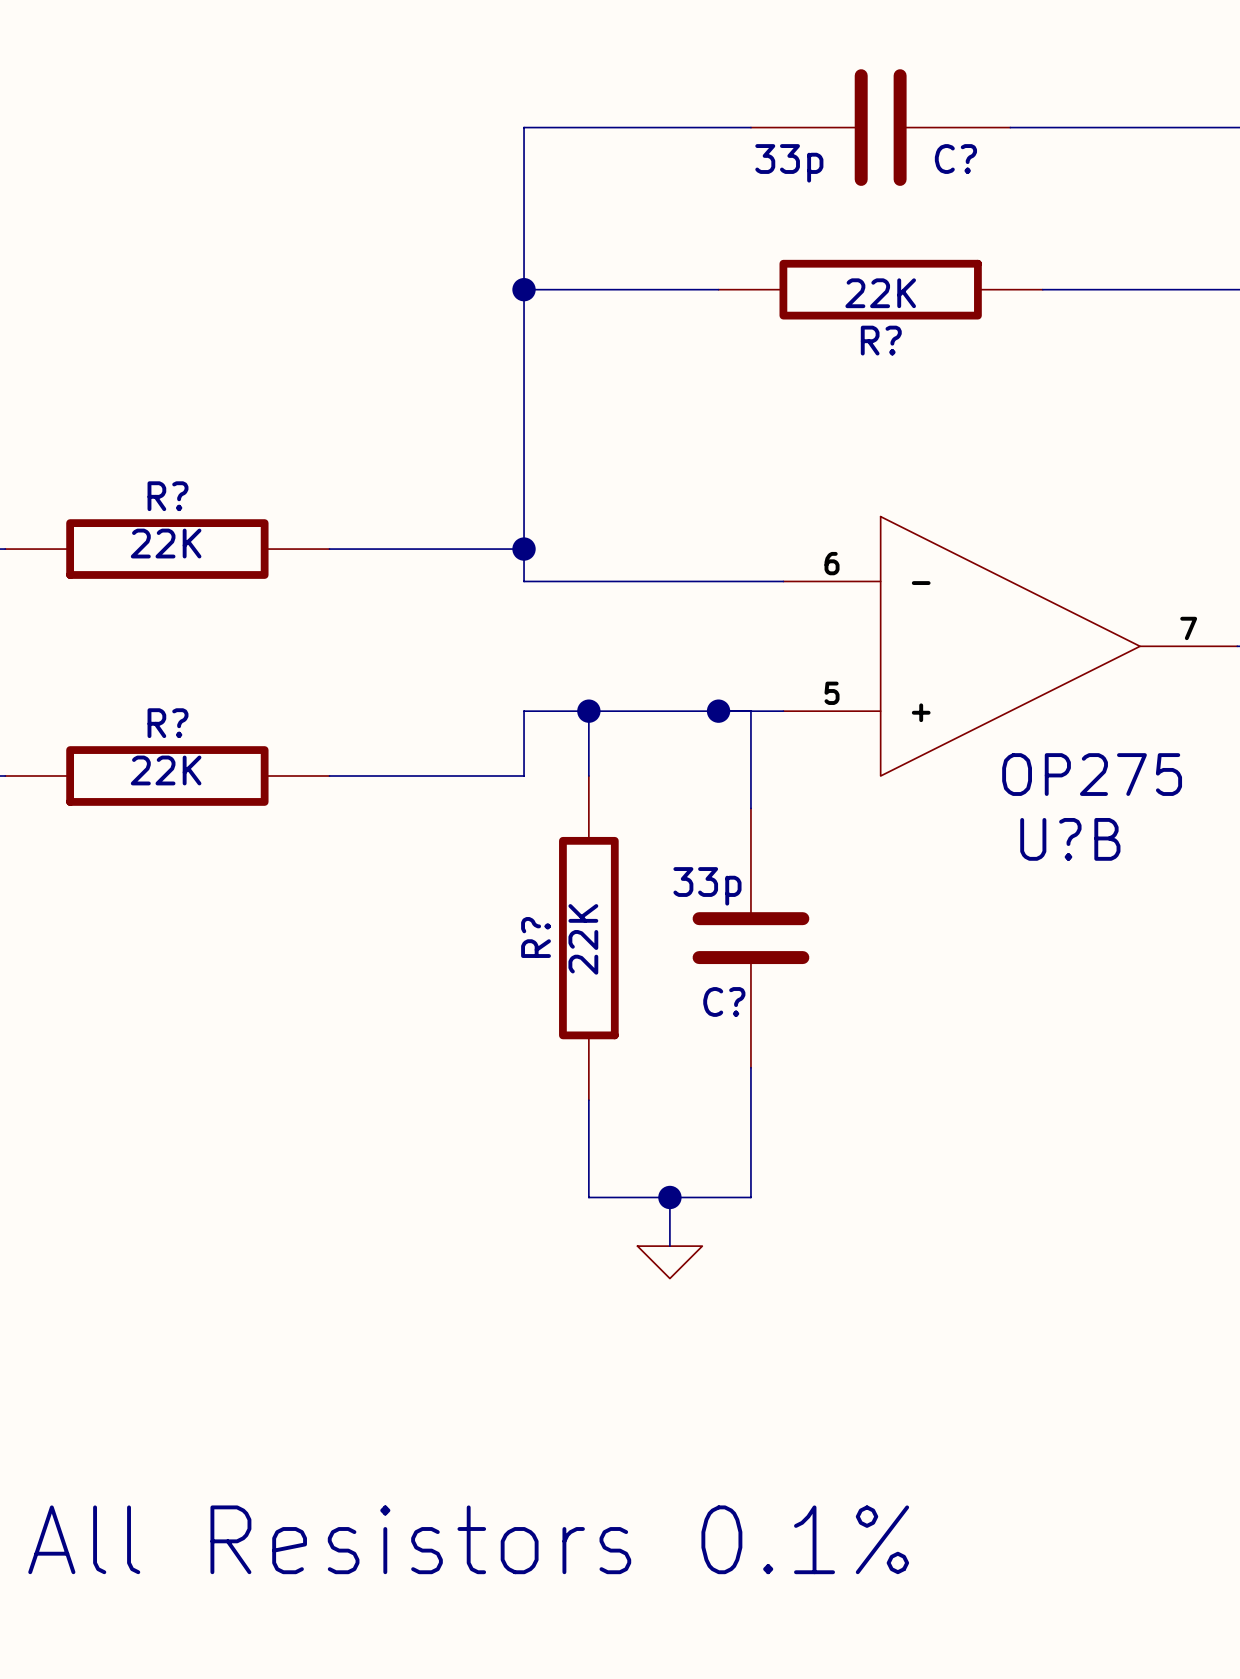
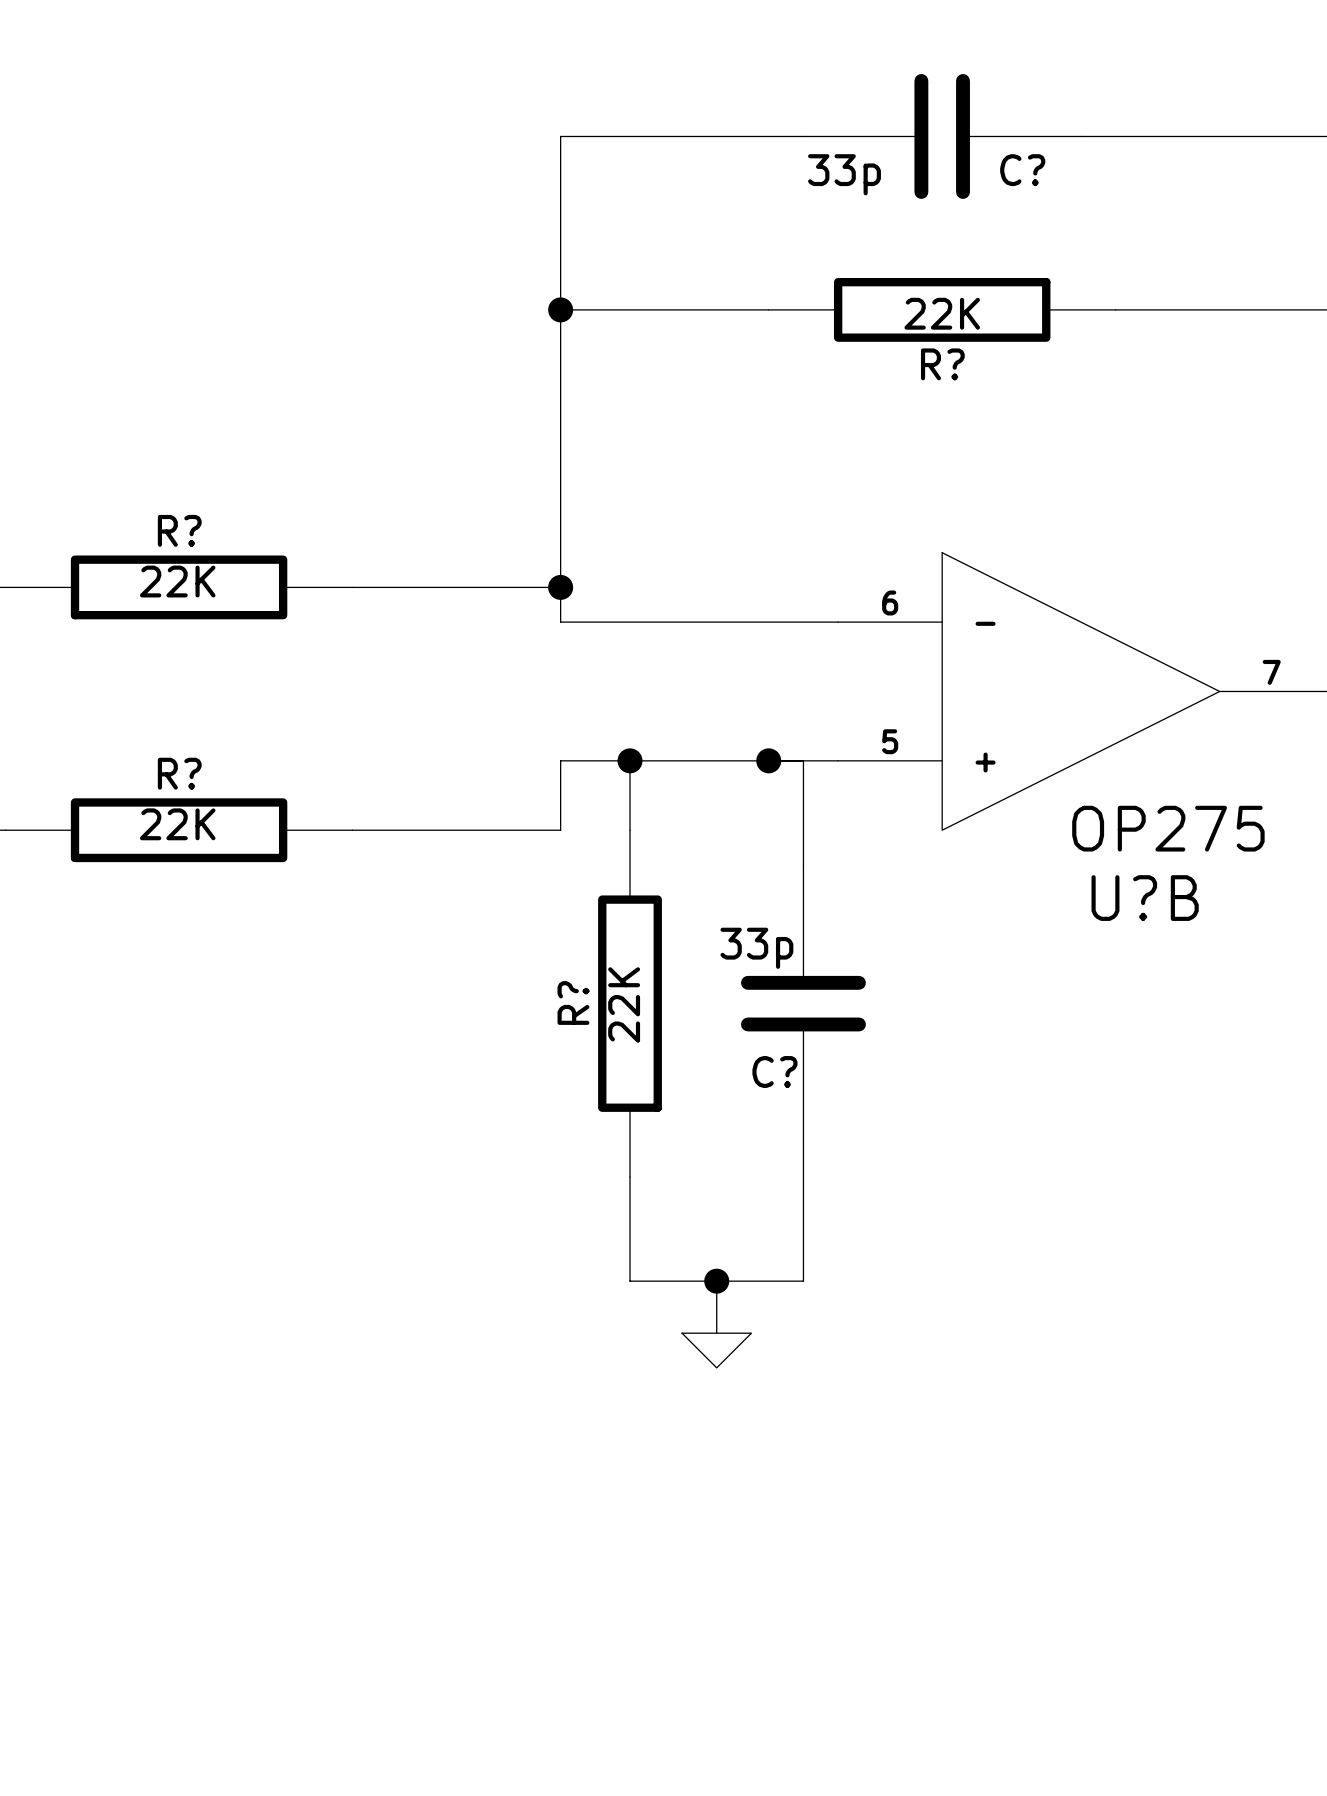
text: All Resistors 0.1% (468, 1539) -> none

